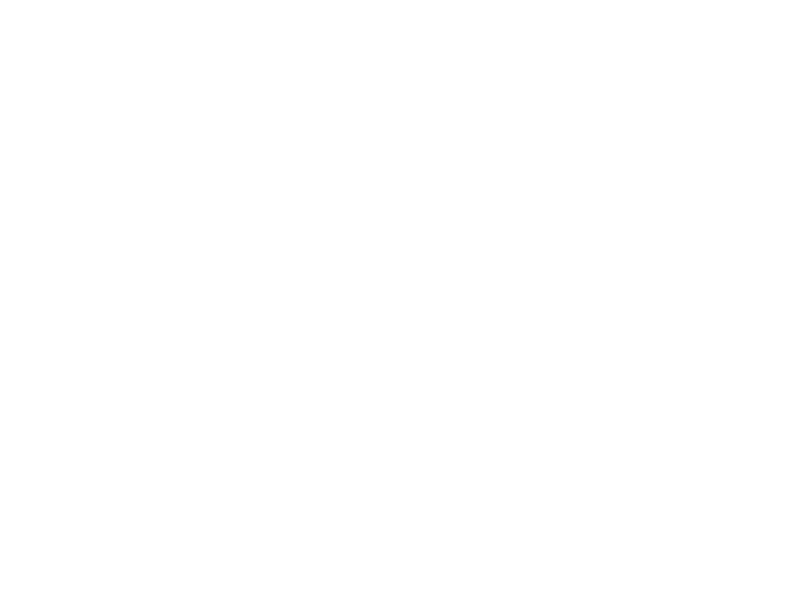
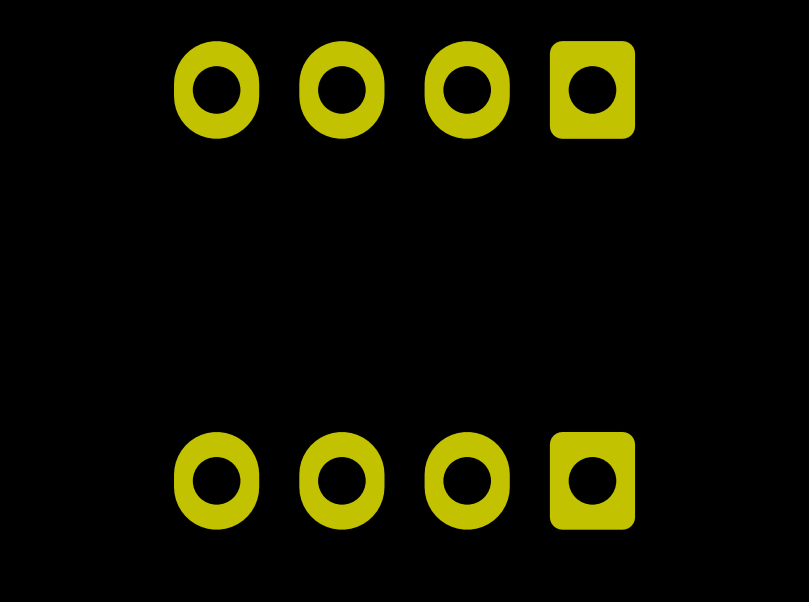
part: none -> (404, 89)
part: none -> (404, 480)

